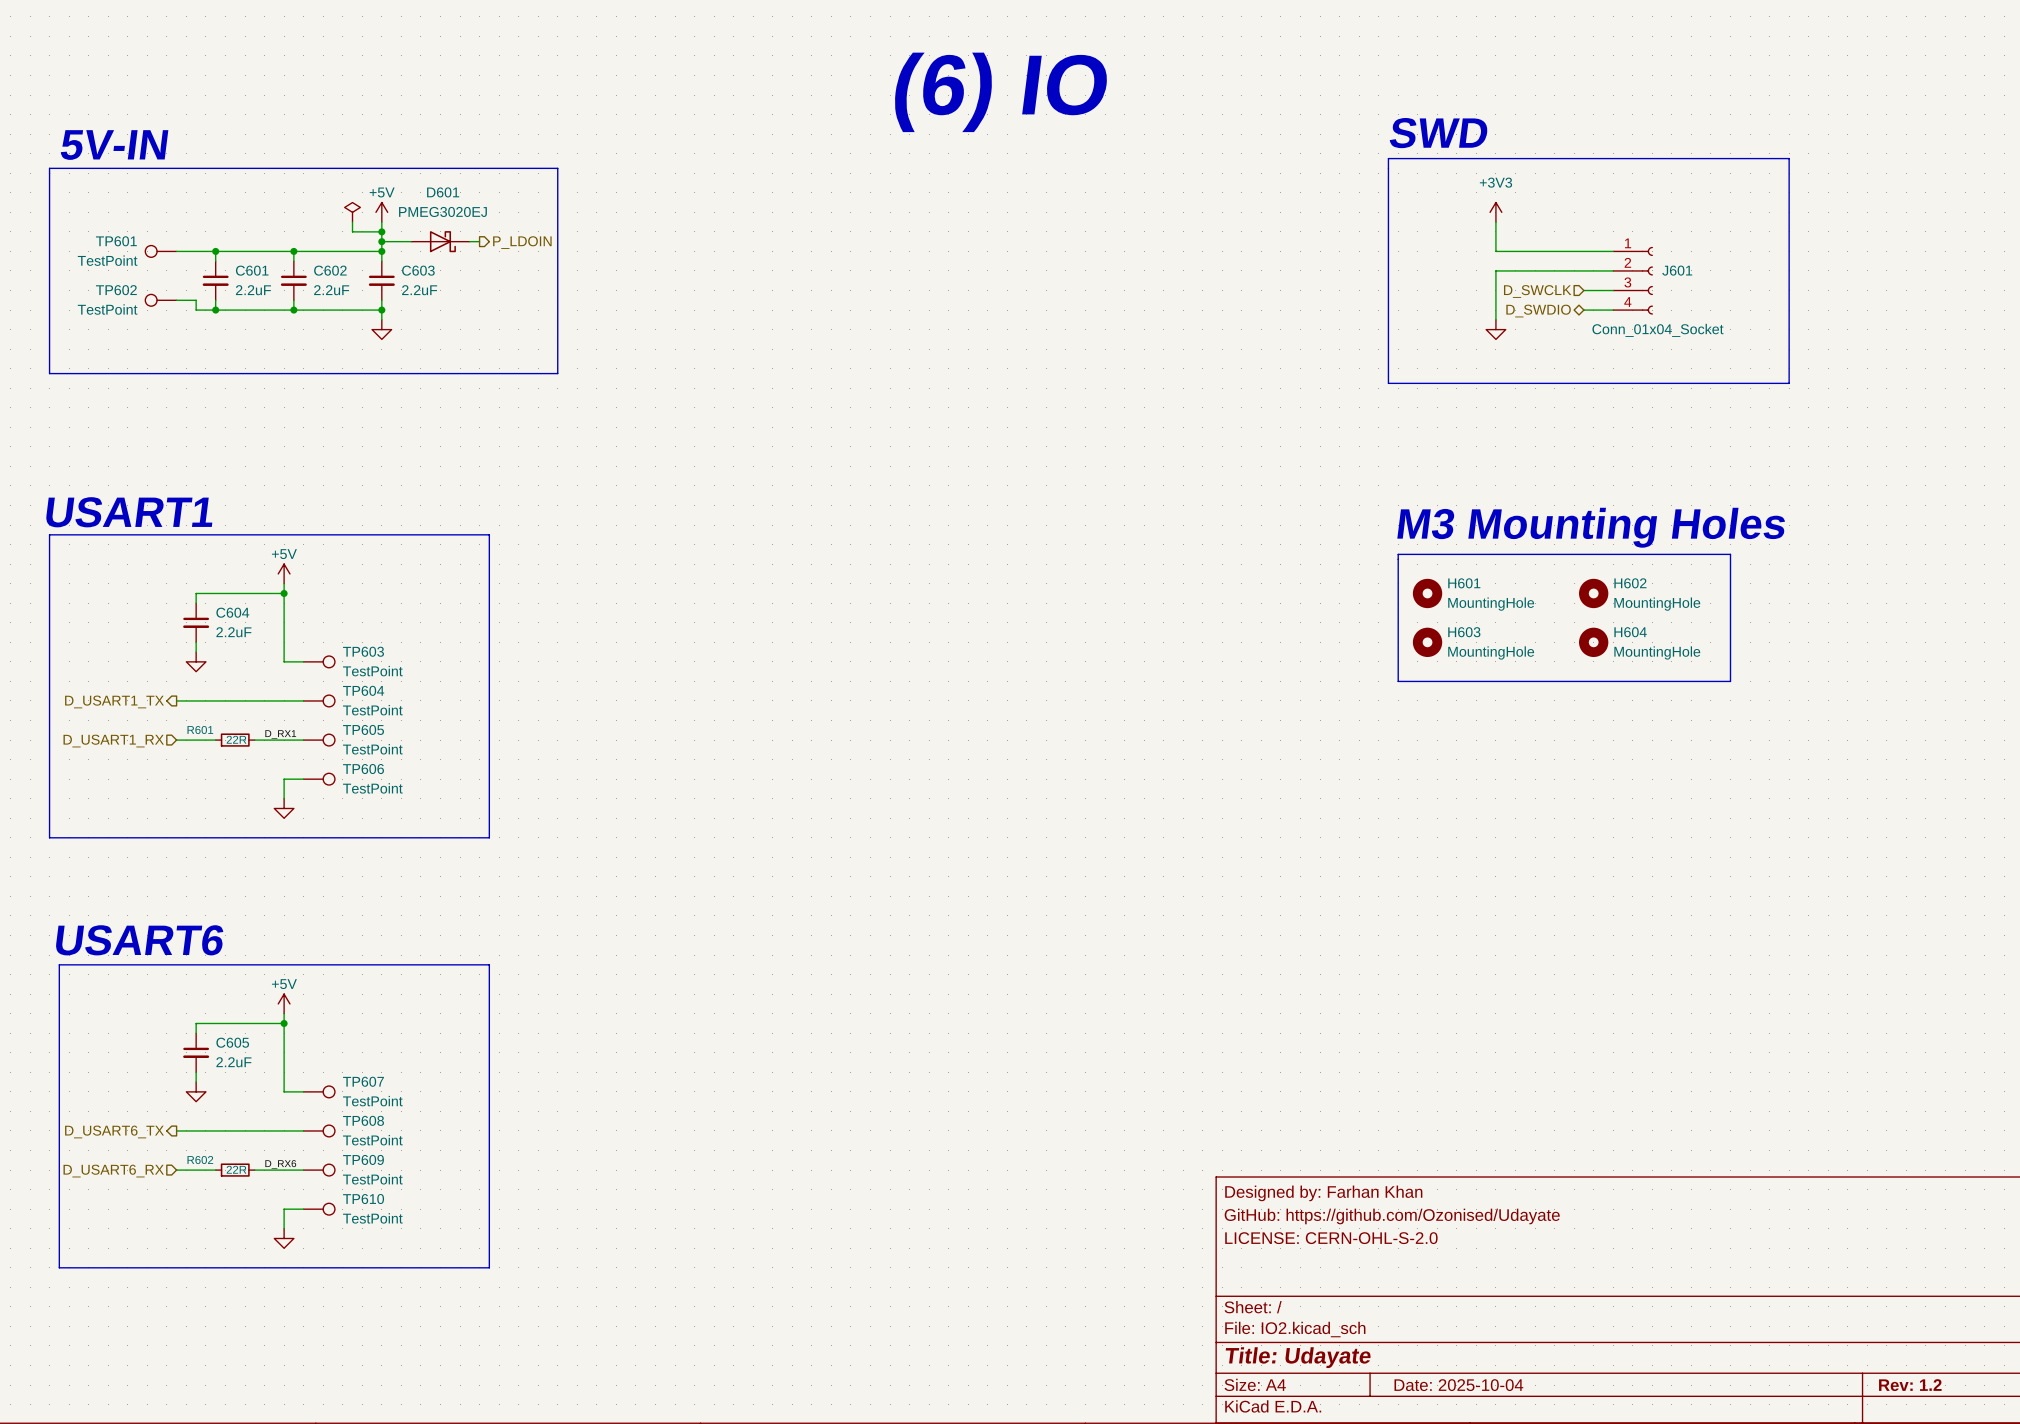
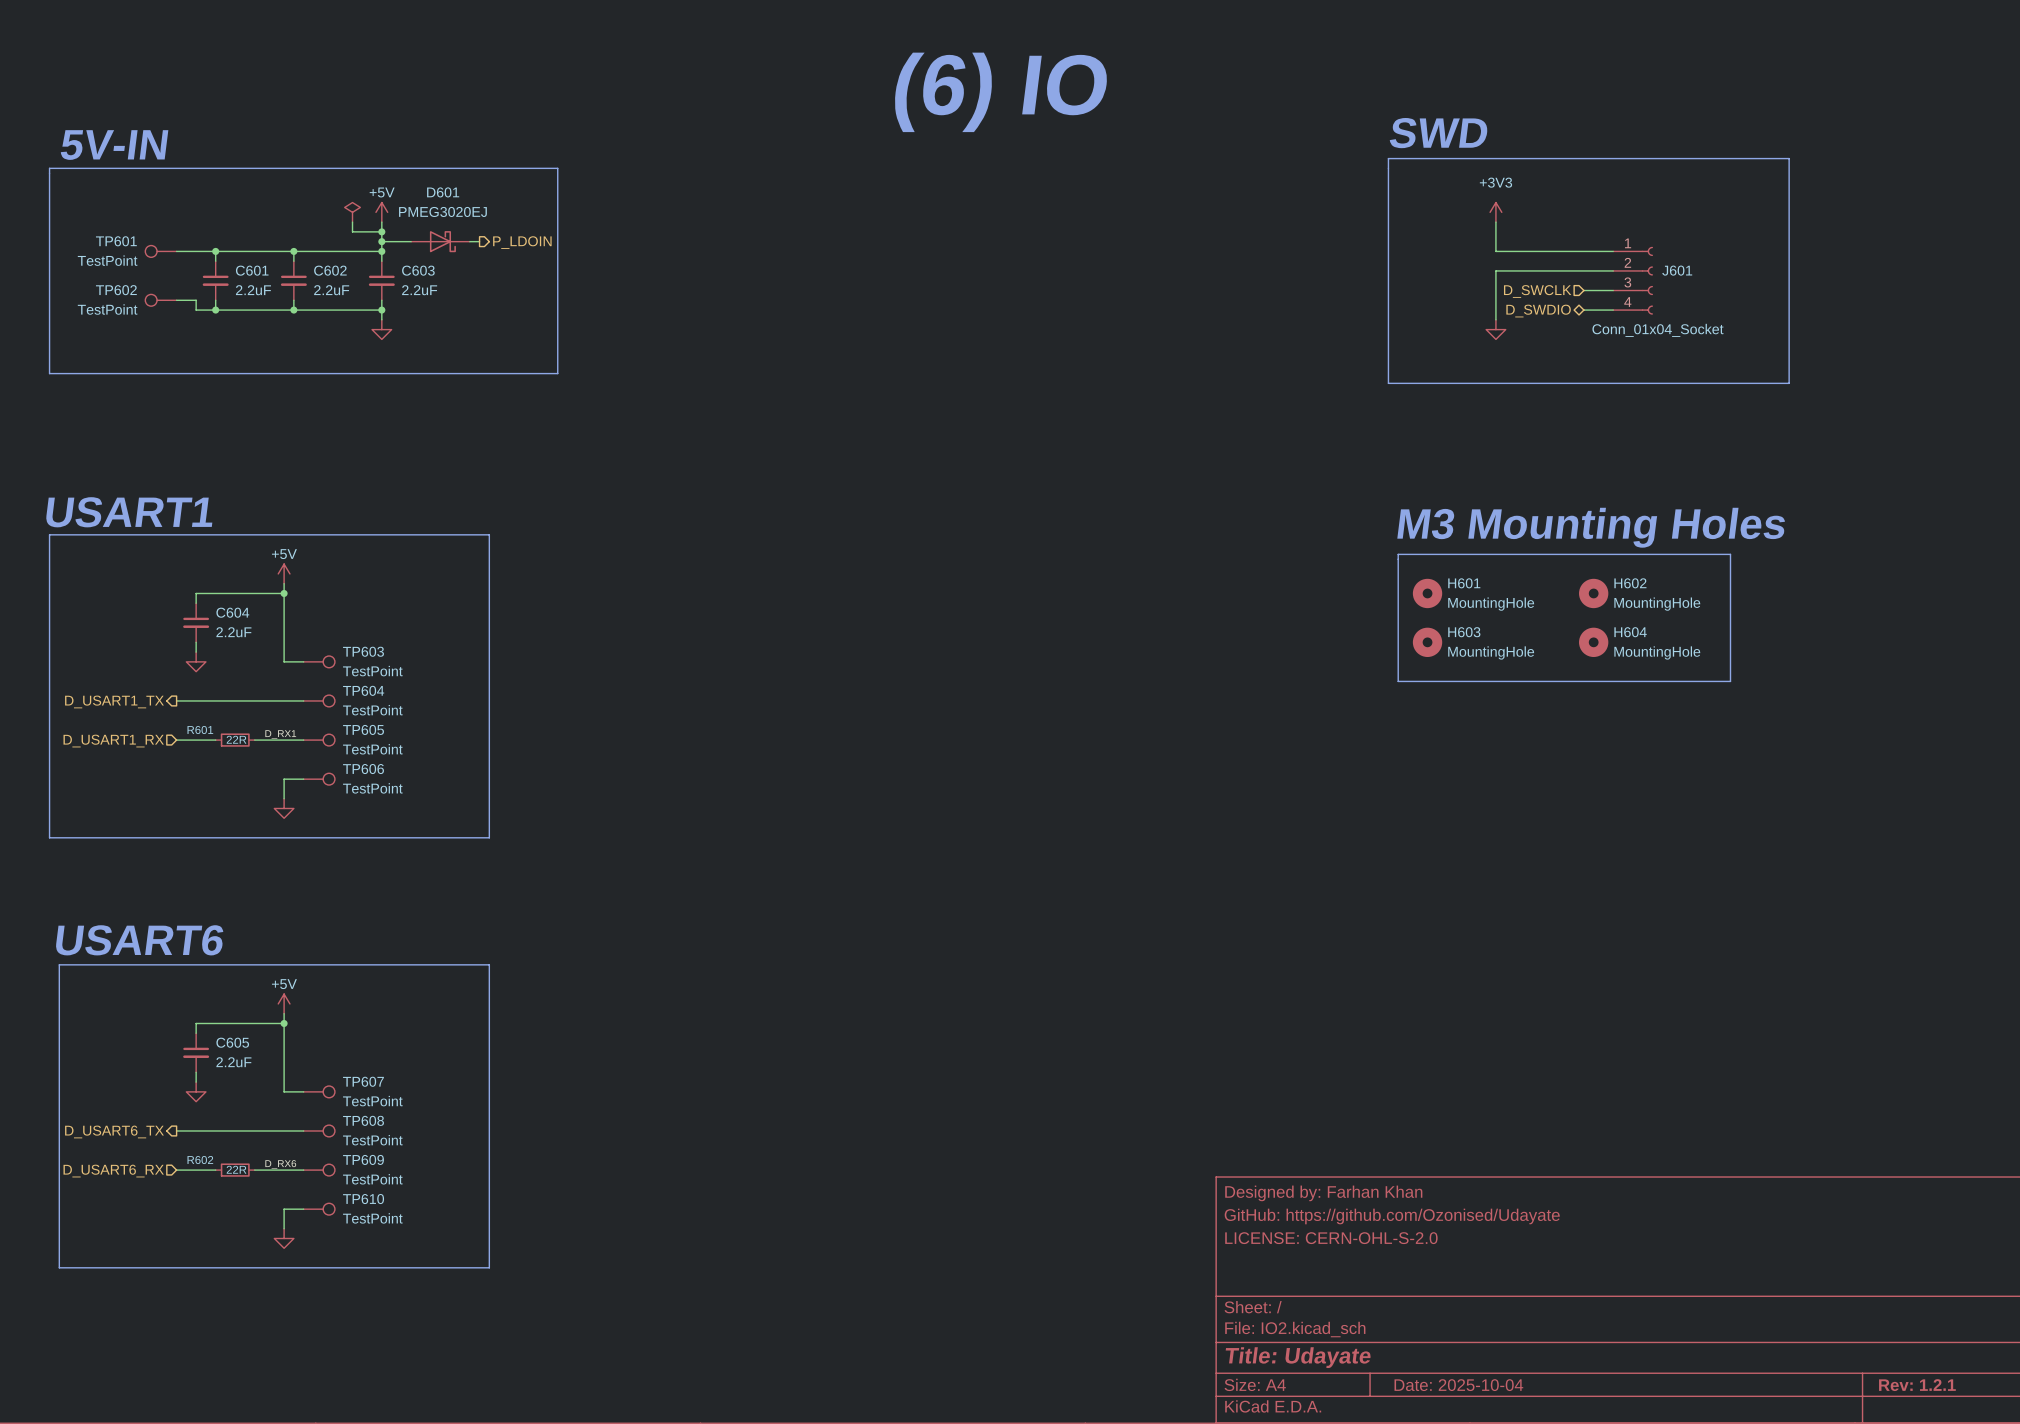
title block: Rev: 1.2 (1910, 1385) -> Rev: 1.2.1 (1917, 1385)

